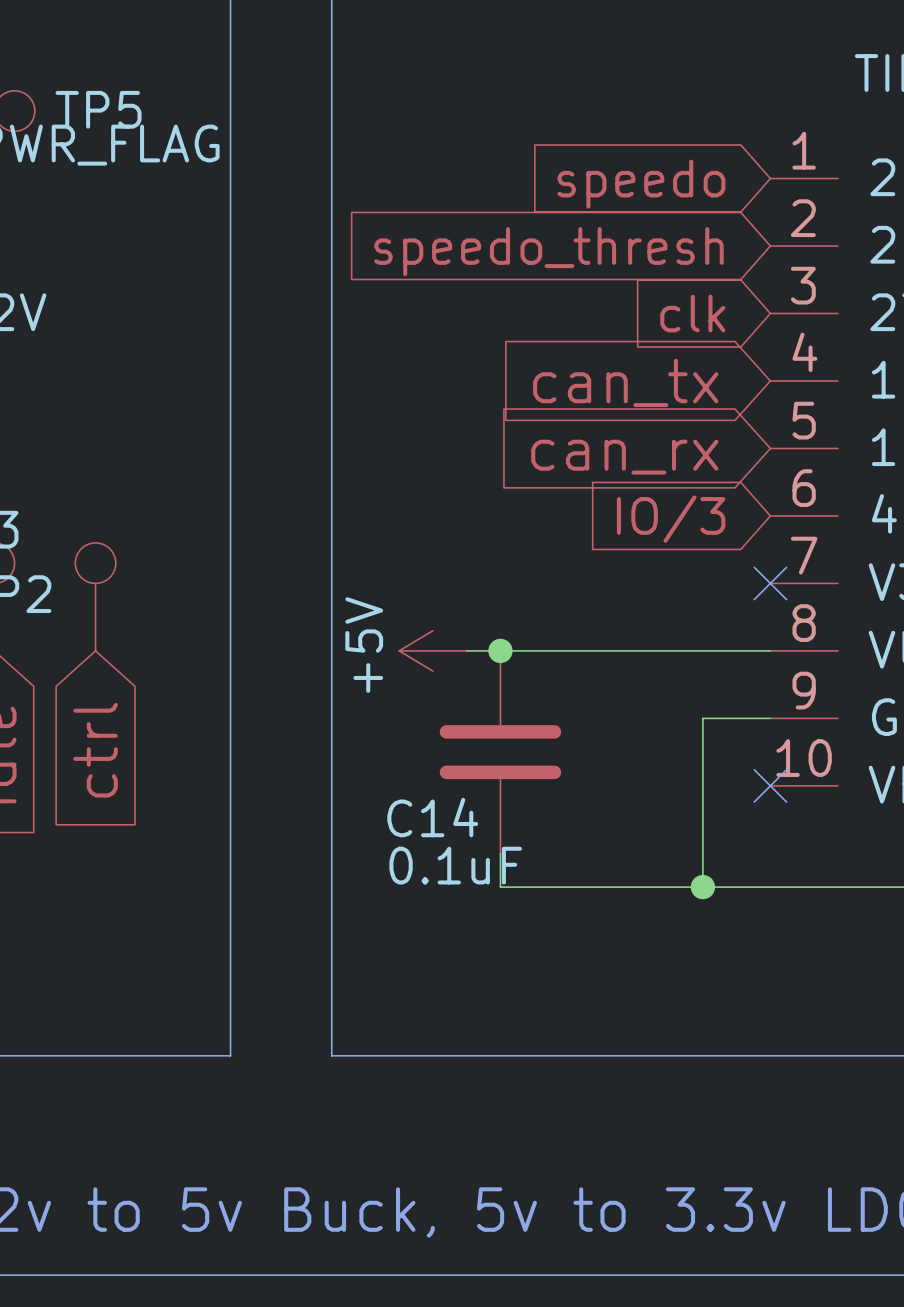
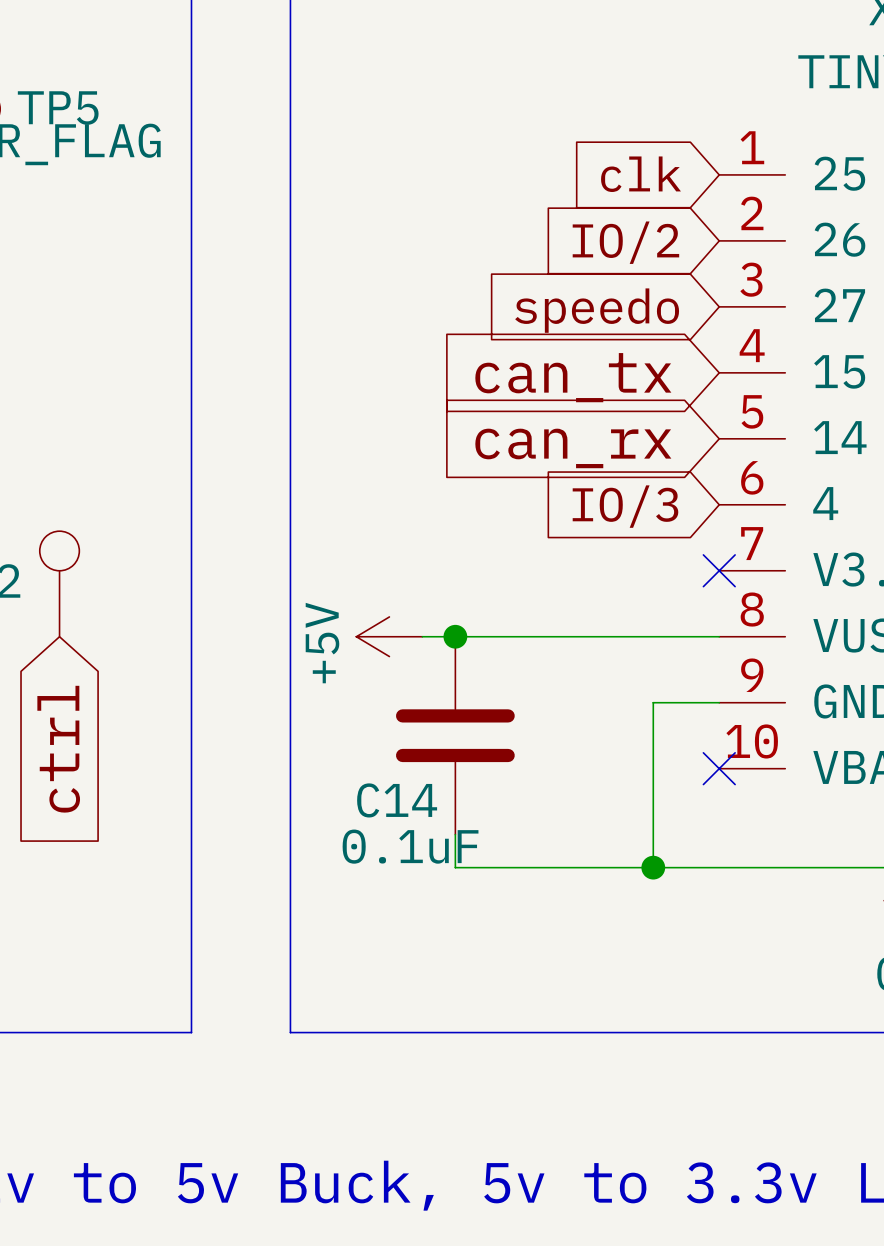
global label: speedo (641, 184) -> clk (640, 174)
global label: speedo_thresh (549, 251) -> IO/2 (625, 242)
global label: clk (692, 313) -> speedo (597, 310)

